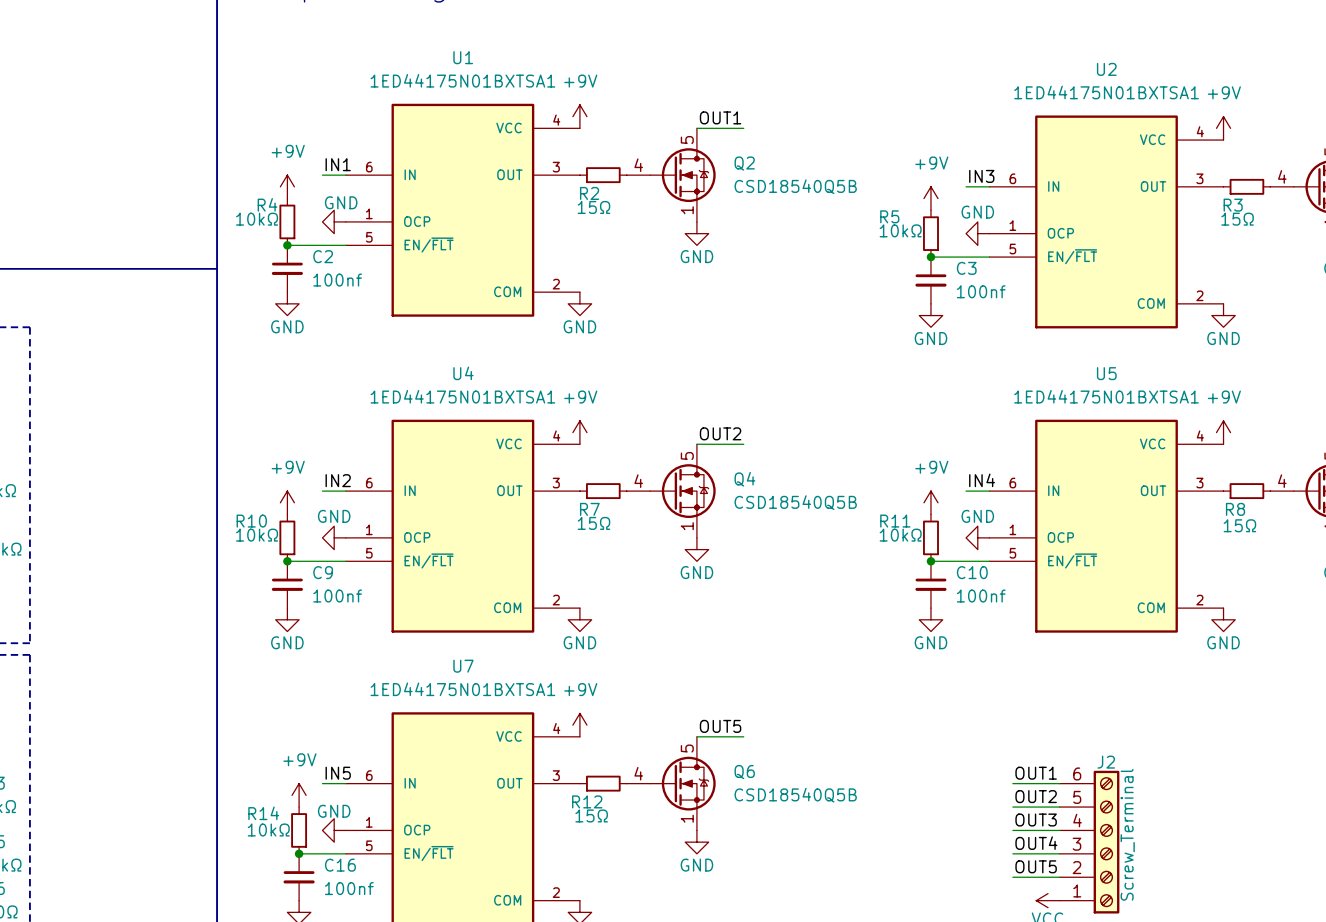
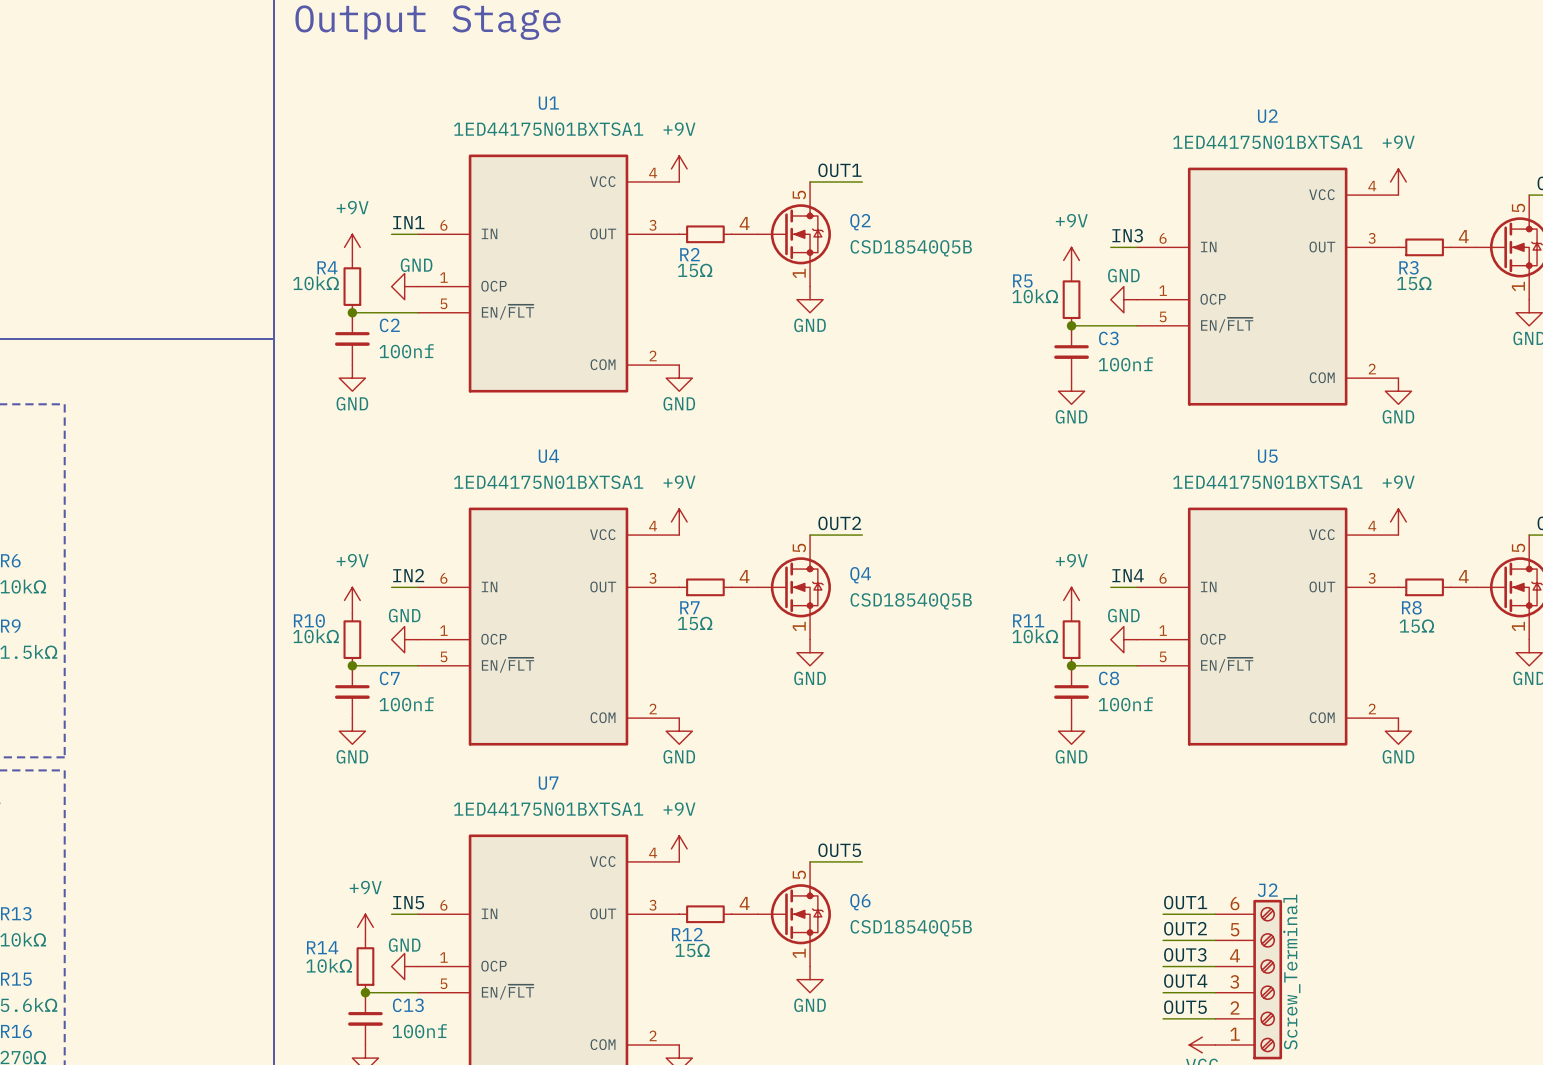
C9 name: C9 (323, 572) -> C7 (389, 678)
C10 name: C10 (972, 572) -> C8 (1109, 678)
C16 name: C16 (340, 865) -> C13 (408, 1005)

